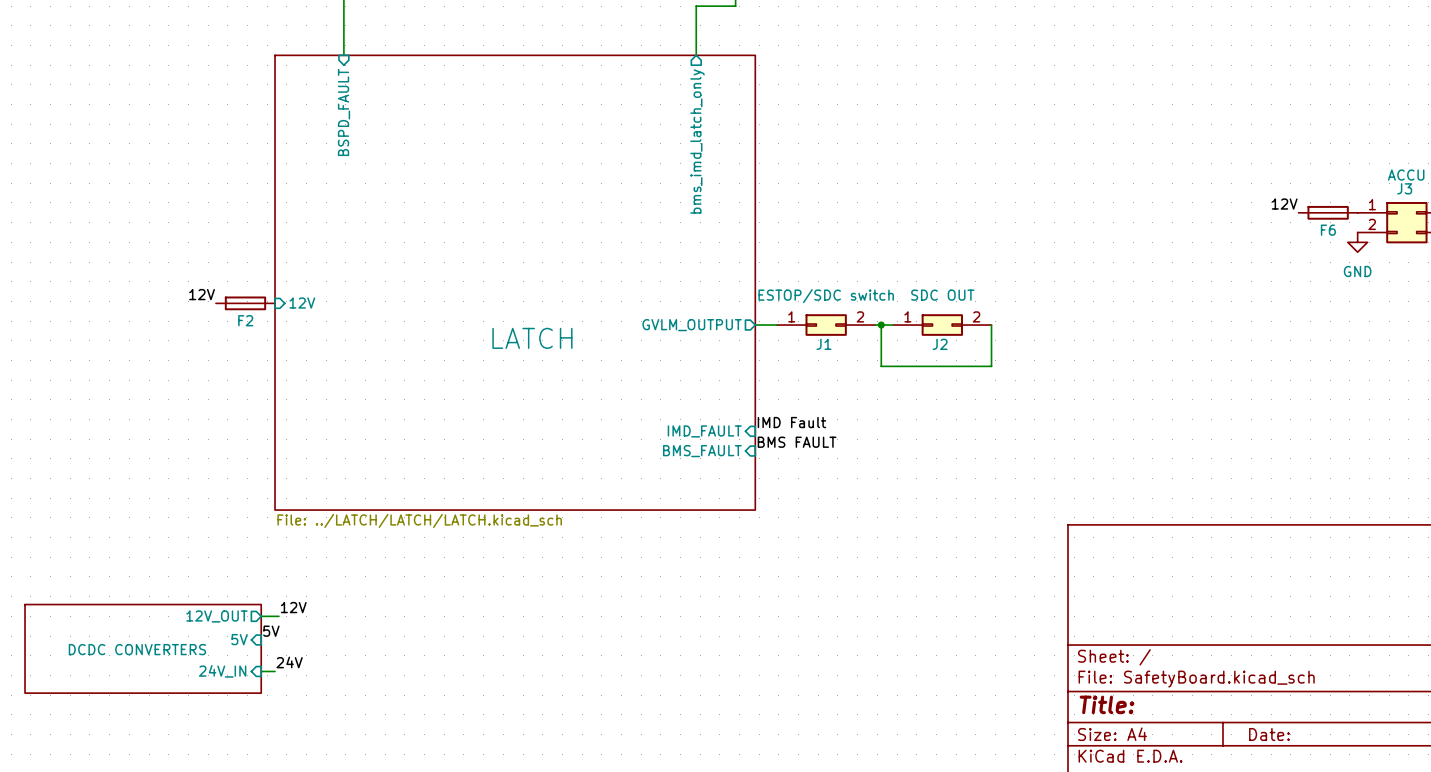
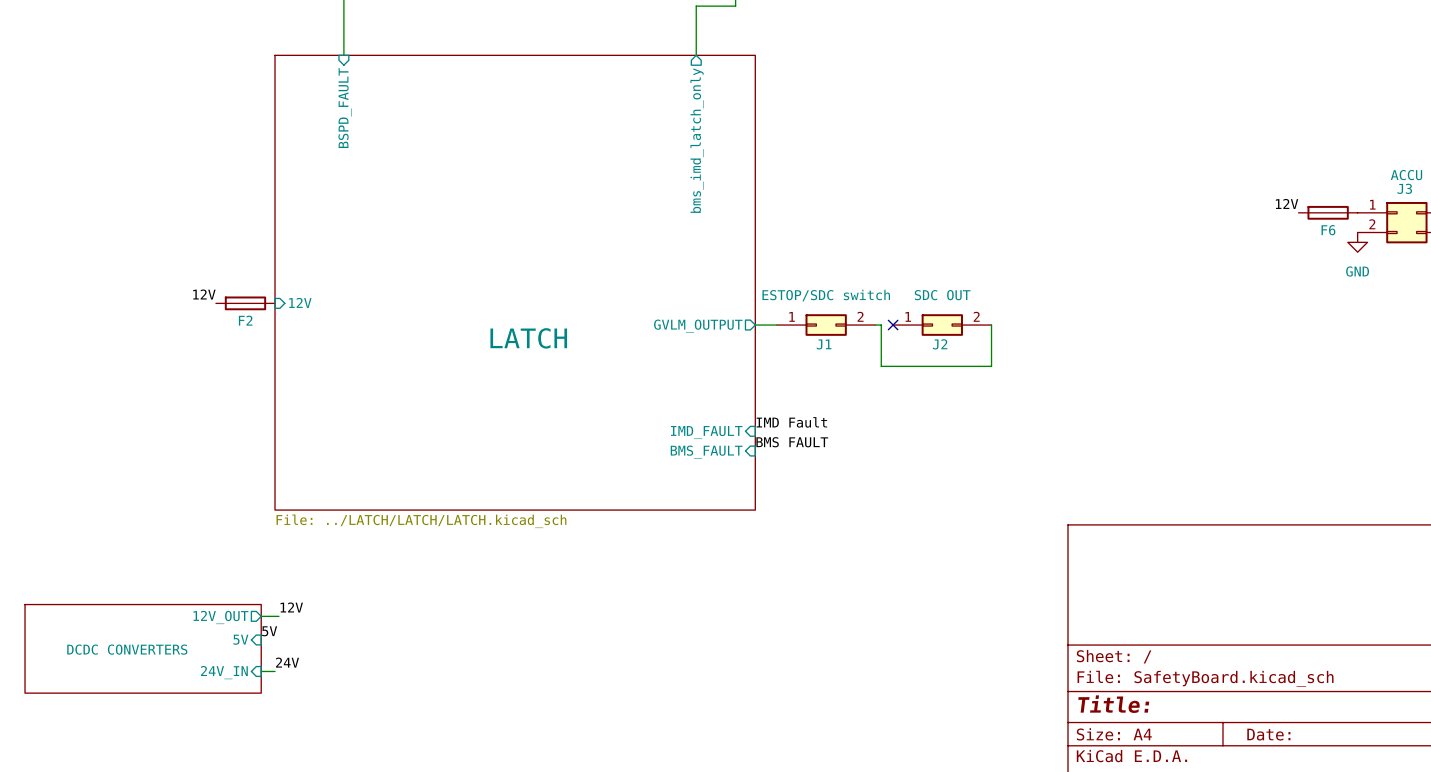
wire: (881, 325) (893, 325) -> none
junction: (881, 325) -> none
no-connect mark: none -> (893, 325)

